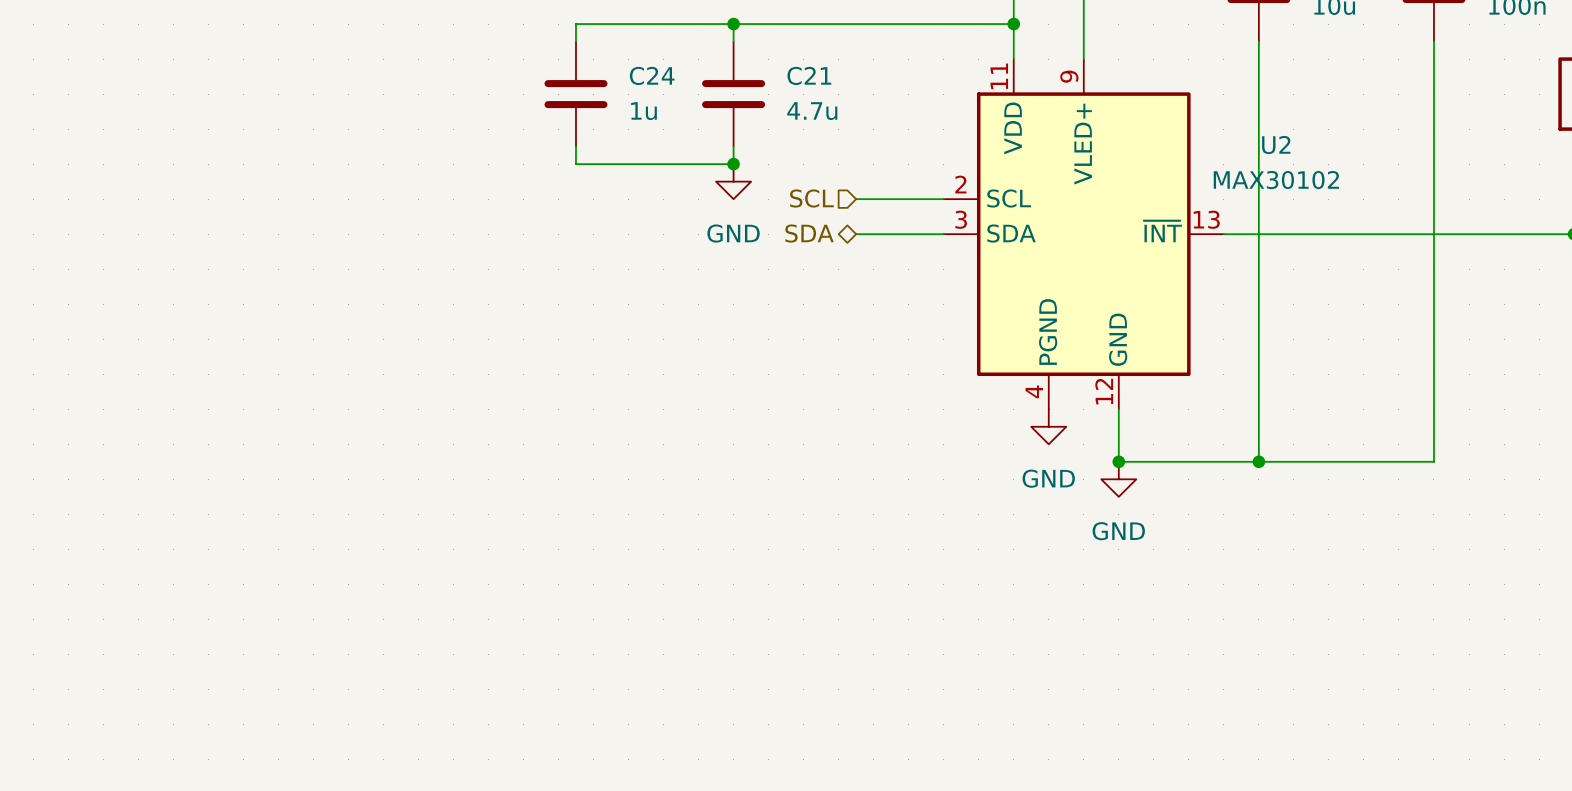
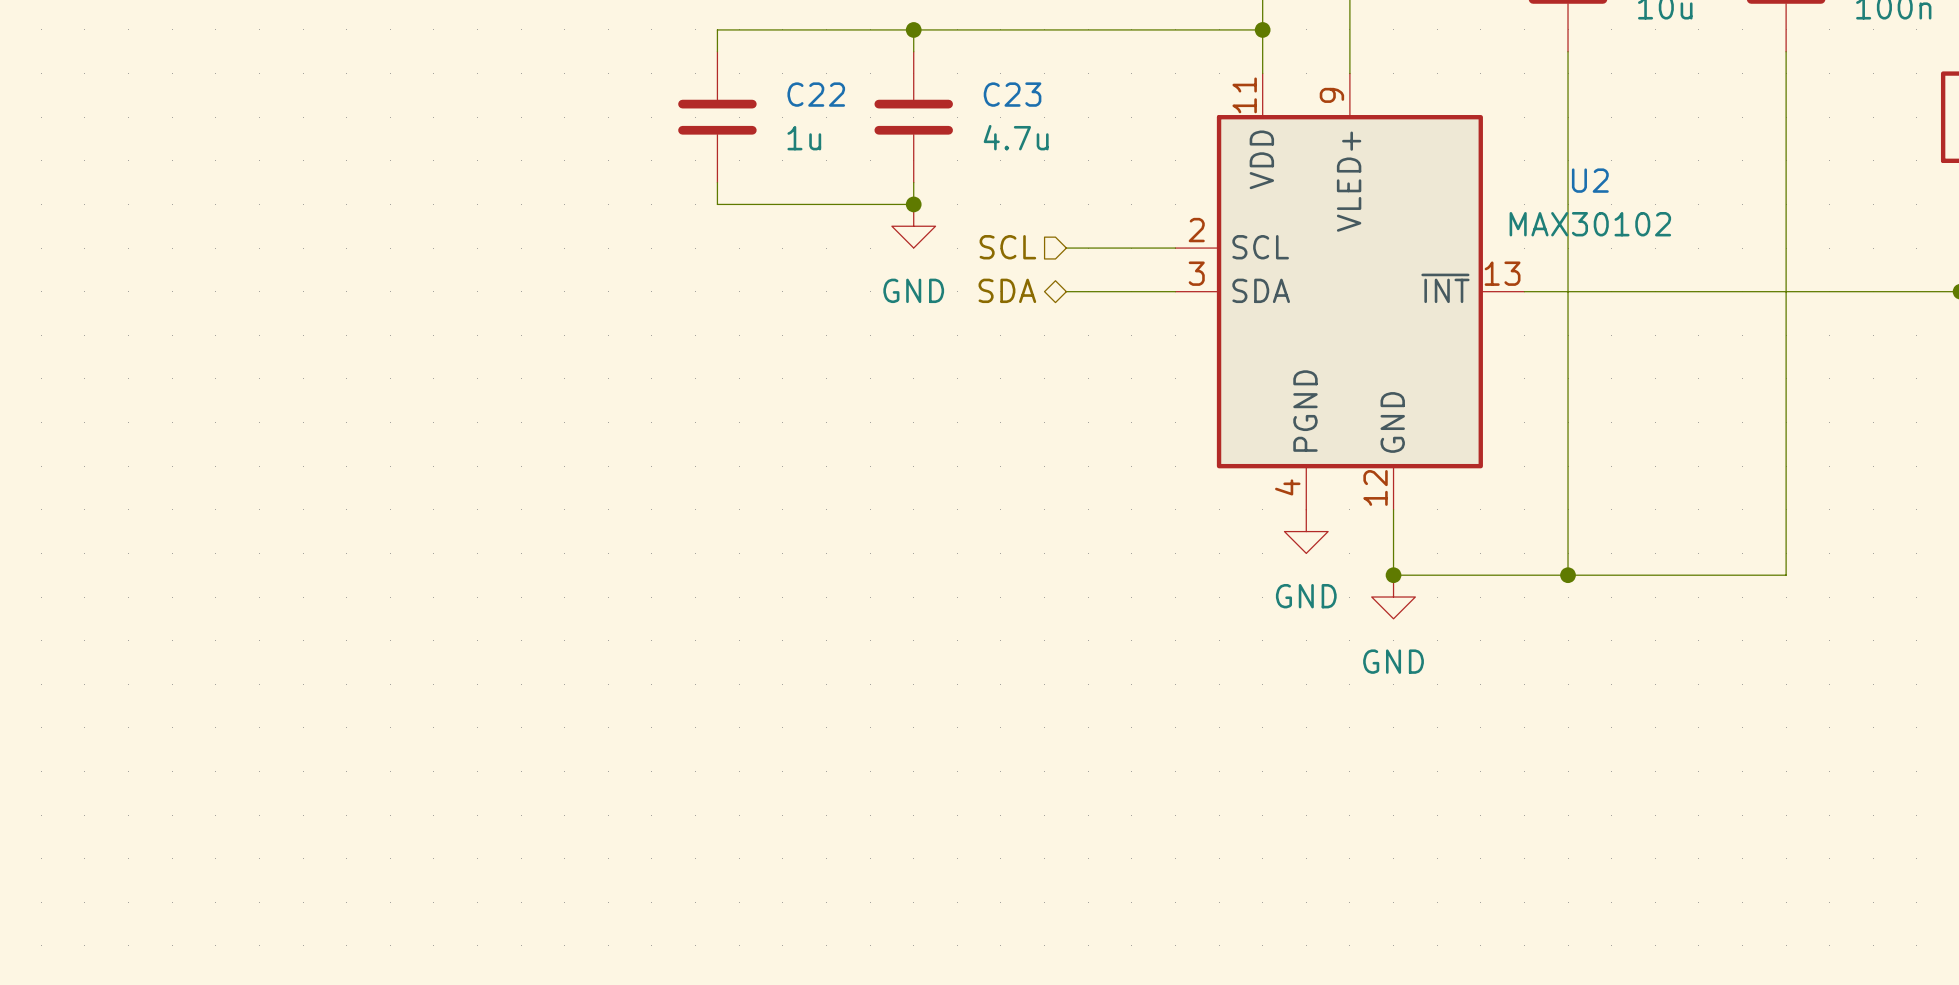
C24 name: C24 (652, 75) -> C22 (816, 94)
C21 name: C21 (809, 75) -> C23 (1012, 94)

